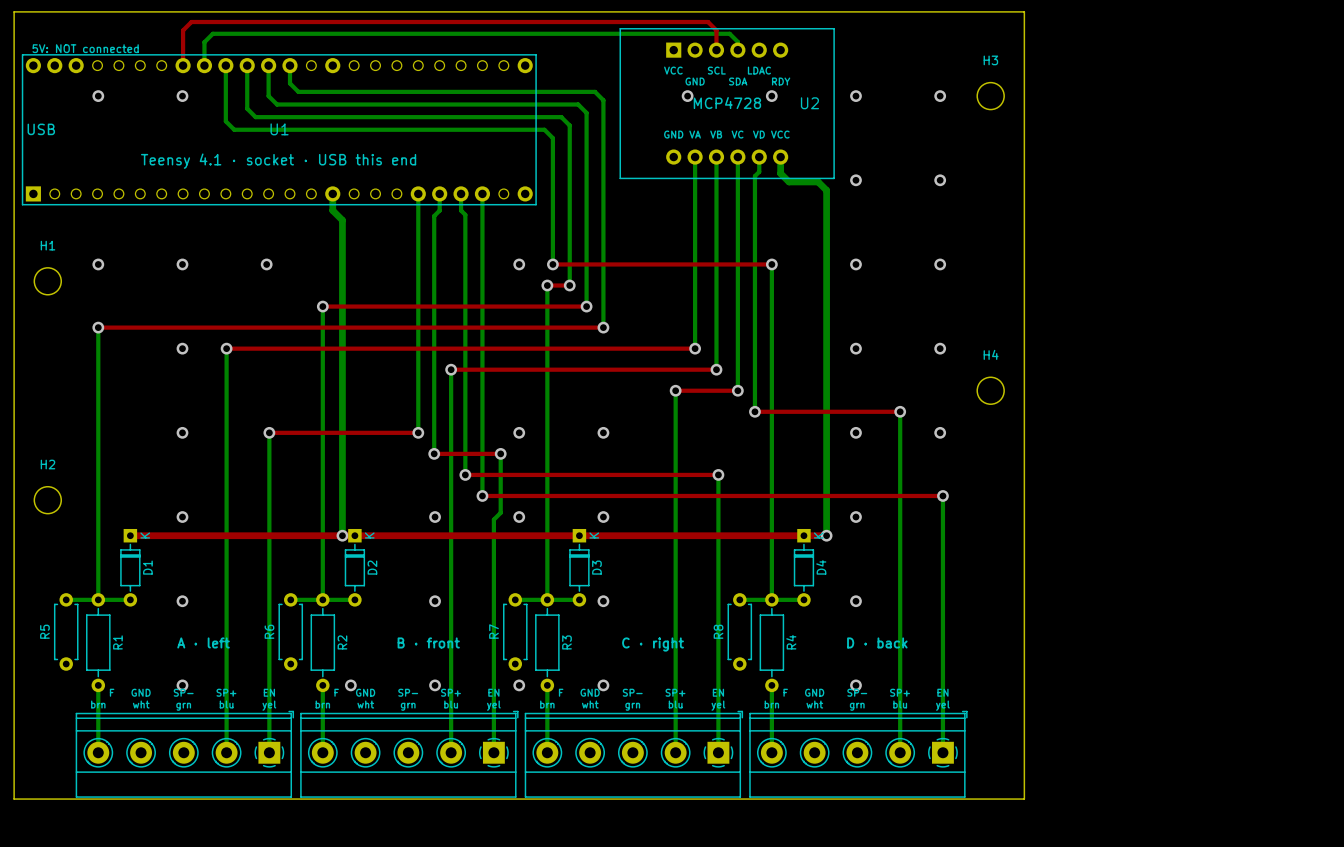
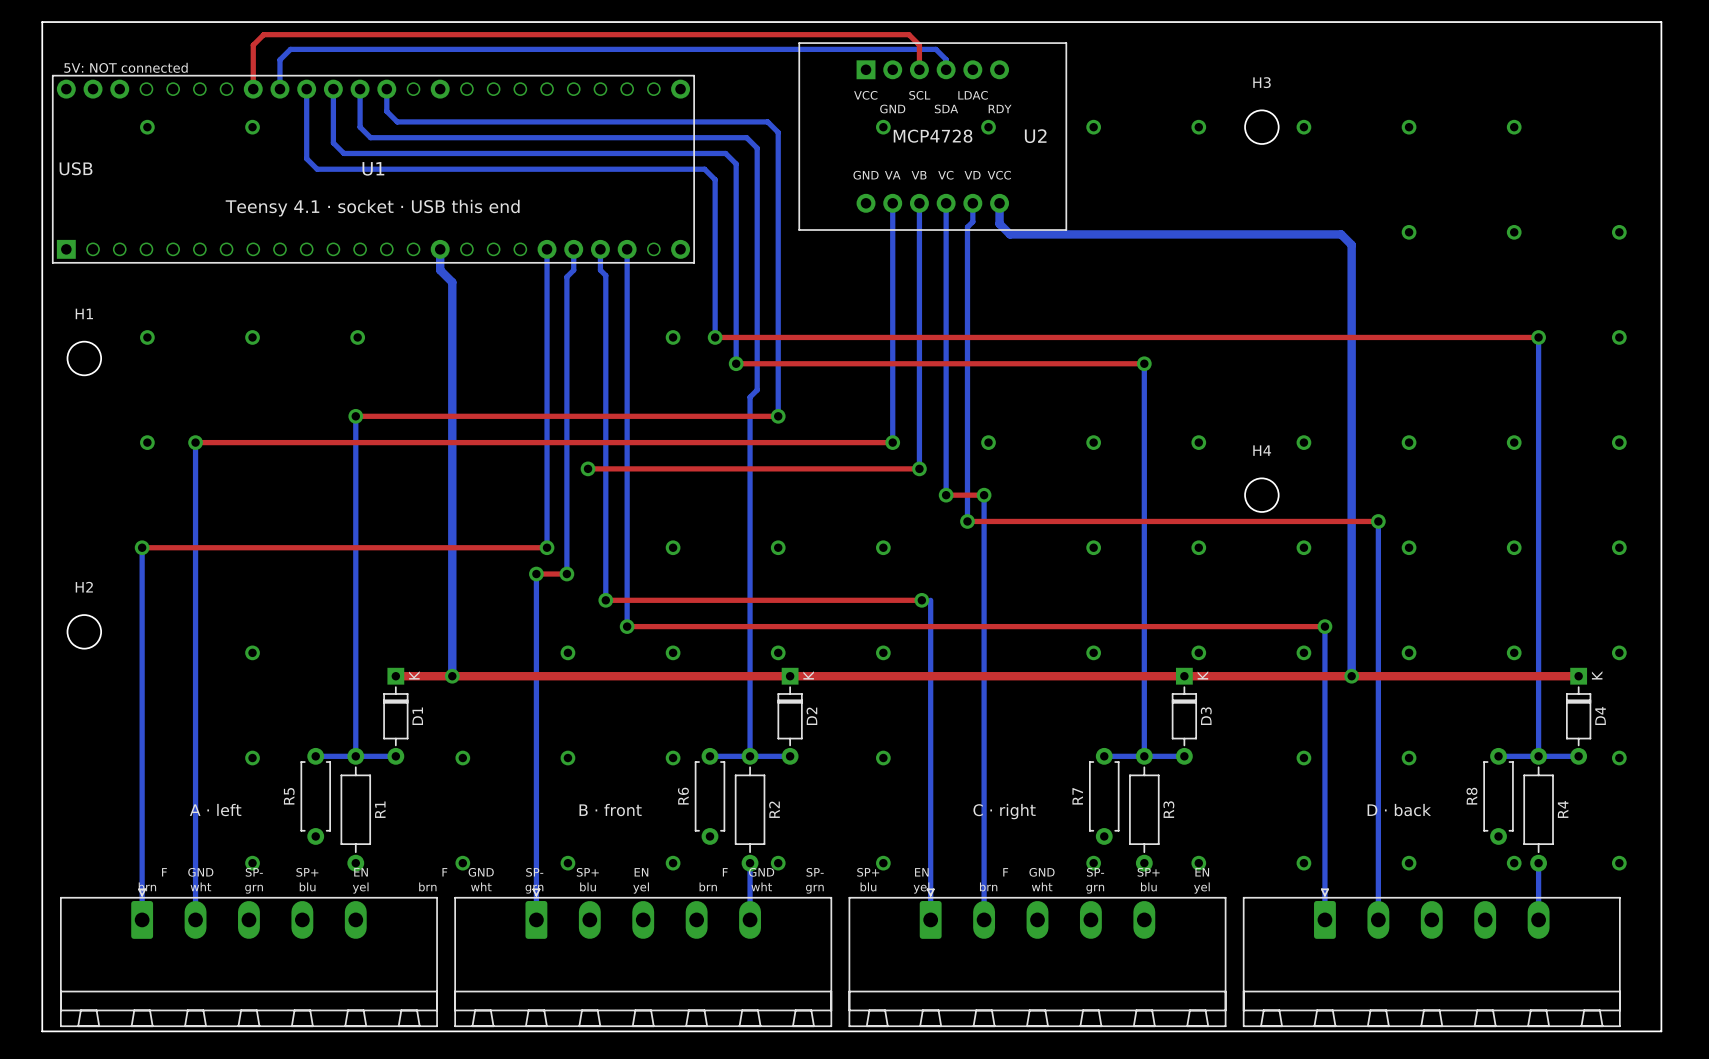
board edge: (1024, 11) (1024, 799) (14, 799) -> (1303, 22) (1661, 22) (1661, 1031) (42, 1031) (42, 1005)
via: none -> (1303, 127)
via: none -> (1409, 127)
via: none -> (1514, 127)
via: (855, 180) -> none
via: (940, 180) -> none
via: none -> (1409, 232)
via: none -> (1514, 232)
via: none -> (1619, 232)
bottom track: (818, 181) (826, 190) (826, 535) -> (1046, 234) (1341, 234) (1351, 244) (1351, 676)
top track: none -> (988, 337) (1538, 337)
bottom track: (771, 264) (771, 599) -> none
via: (771, 264) -> none
via: (855, 264) -> none
via: (940, 264) -> none
bottom track: none -> (1538, 337) (1538, 756)
via: none -> (1538, 337)
via: none -> (1619, 337)
top track: (547, 285) (569, 285) -> (1144, 363) (736, 363)
bottom track: (547, 285) (547, 599) -> none
via: (547, 285) -> none
bottom track: none -> (1144, 363) (1144, 756)
via: none -> (1144, 363)
top track: (322, 306) (586, 306) -> none
bottom track: (322, 306) (322, 599) -> none
via: (322, 306) -> none
bottom track: none -> (757, 390) (750, 397) (750, 756)
via: (586, 306) -> none
top track: (98, 327) (265, 327) -> none
bottom track: (98, 327) (98, 599) -> (355, 416) (355, 756)
via position: (98, 327) -> (147, 442)
via: none -> (355, 416)
top track: none -> (195, 442) (307, 442)
bottom track: none -> (195, 442) (195, 919)
via: none -> (195, 442)
via: (182, 348) -> none
bottom track: (226, 348) (226, 752) -> none
via: (226, 348) -> none
via: none -> (988, 442)
via: none -> (1303, 442)
via: none -> (1409, 442)
via: none -> (1514, 442)
via: none -> (1619, 442)
bottom track: (451, 369) (451, 752) -> none
top track: (675, 390) (737, 390) -> (984, 495) (946, 495)
bottom track: (675, 390) (675, 752) -> none
via position: (675, 390) -> (883, 547)
bottom track: none -> (984, 495) (984, 919)
via: none -> (984, 495)
top track: none -> (1148, 521) (1378, 521)
bottom track: (900, 411) (900, 752) -> none
via: (900, 411) -> none
bottom track: none -> (1378, 521) (1378, 919)
via: none -> (1378, 521)
top track: none -> (142, 547) (361, 547)
bottom track: none -> (142, 547) (142, 919)
via: none -> (142, 547)
via: (182, 432) -> none
bottom track: (269, 432) (269, 752) -> none
via: (269, 432) -> none
via: none -> (1303, 547)
via: none -> (1409, 547)
via: none -> (1514, 547)
via: none -> (1619, 547)
bottom track: none -> (536, 574) (536, 919)
via: none -> (536, 574)
top track: (434, 453) (500, 453) -> (566, 574) (536, 574)
bottom track: (500, 453) (500, 512) (493, 519) (493, 752) -> none
via: (500, 453) -> none
bottom track: (718, 474) (718, 752) -> none
bottom track: none -> (930, 600) (930, 919)
top track: none -> (1202, 626) (1324, 626)
bottom track: (942, 495) (942, 752) -> none
via position: (942, 495) -> (1198, 652)
bottom track: none -> (1324, 626) (1324, 919)
via: none -> (1324, 626)
via: none -> (883, 652)
via: none -> (1303, 652)
via: none -> (1409, 652)
via: none -> (1514, 652)
via: none -> (1619, 652)
top track: (130, 535) (297, 535) -> none
top track: none -> (1056, 676) (1578, 676)
via: (826, 535) -> none
via: none -> (1351, 676)
D1 position: (130, 567) -> (395, 716)
D2 position: (354, 567) -> (790, 716)
D3 position: (579, 567) -> (1184, 716)
D4 position: (803, 567) -> (1578, 716)
bottom track: (66, 599) (130, 599) -> none
bottom track: (297, 599) (354, 599) -> (315, 756) (387, 756)
bottom track: (515, 599) (548, 599) -> (748, 756) (790, 756)
bottom track: (739, 599) (803, 599) -> (1104, 756) (1184, 756)
bottom track: none -> (1498, 756) (1578, 756)
via: none -> (462, 758)
via: none -> (673, 758)
via: (603, 601) -> none
via: none -> (883, 758)
via: (855, 601) -> none
via: none -> (1303, 758)
via: none -> (1409, 758)
via: none -> (1619, 758)
R5 position: (66, 631) -> (315, 796)
R6 position: (290, 631) -> (709, 796)
R7 position: (515, 631) -> (1104, 796)
R8 position: (739, 631) -> (1498, 796)
R1 position: (98, 642) -> (355, 809)
text position: A · left (203, 642) -> A · left (215, 810)
R2 position: (322, 642) -> (750, 809)
text position: B · front (428, 642) -> B · front (610, 810)
R3 position: (547, 642) -> (1144, 809)
R4 position: (771, 642) -> (1538, 809)
text: D · back (877, 642) -> none
text: none -> D · back (1399, 810)
text position: C · right (653, 644) -> C · right (1004, 811)
bottom track: (98, 685) (98, 752) -> none
bottom track: (322, 685) (322, 752) -> none
bottom track: (547, 685) (547, 752) -> none
bottom track: none -> (750, 863) (750, 919)
via: none -> (883, 863)
bottom track: (771, 685) (771, 752) -> none
via: none -> (1198, 863)
via: none -> (1303, 863)
via: none -> (1409, 863)
via: none -> (1514, 863)
bottom track: none -> (1538, 863) (1538, 919)
via: none -> (1619, 863)
part: (184, 754) -> none
part: (409, 754) -> none
part: (633, 754) -> none
part: (858, 754) -> none
part: none -> (248, 957)
part: none -> (643, 957)
part: none -> (1037, 957)
part: none -> (1431, 957)

